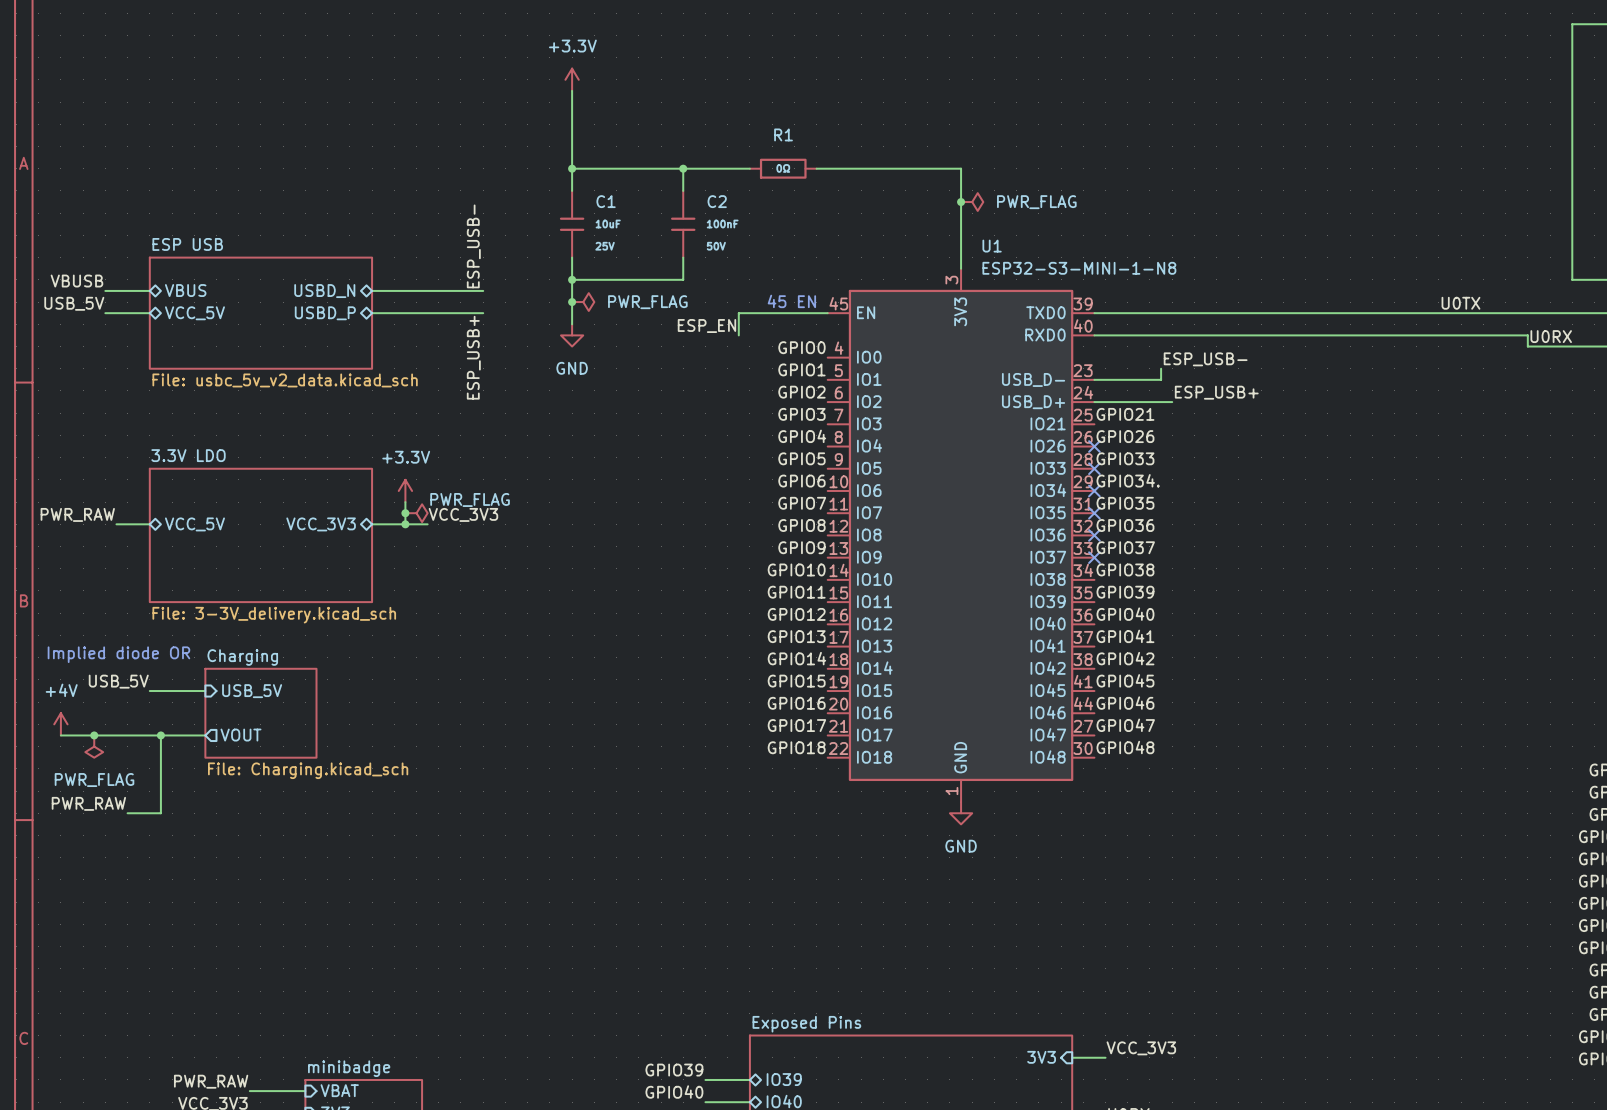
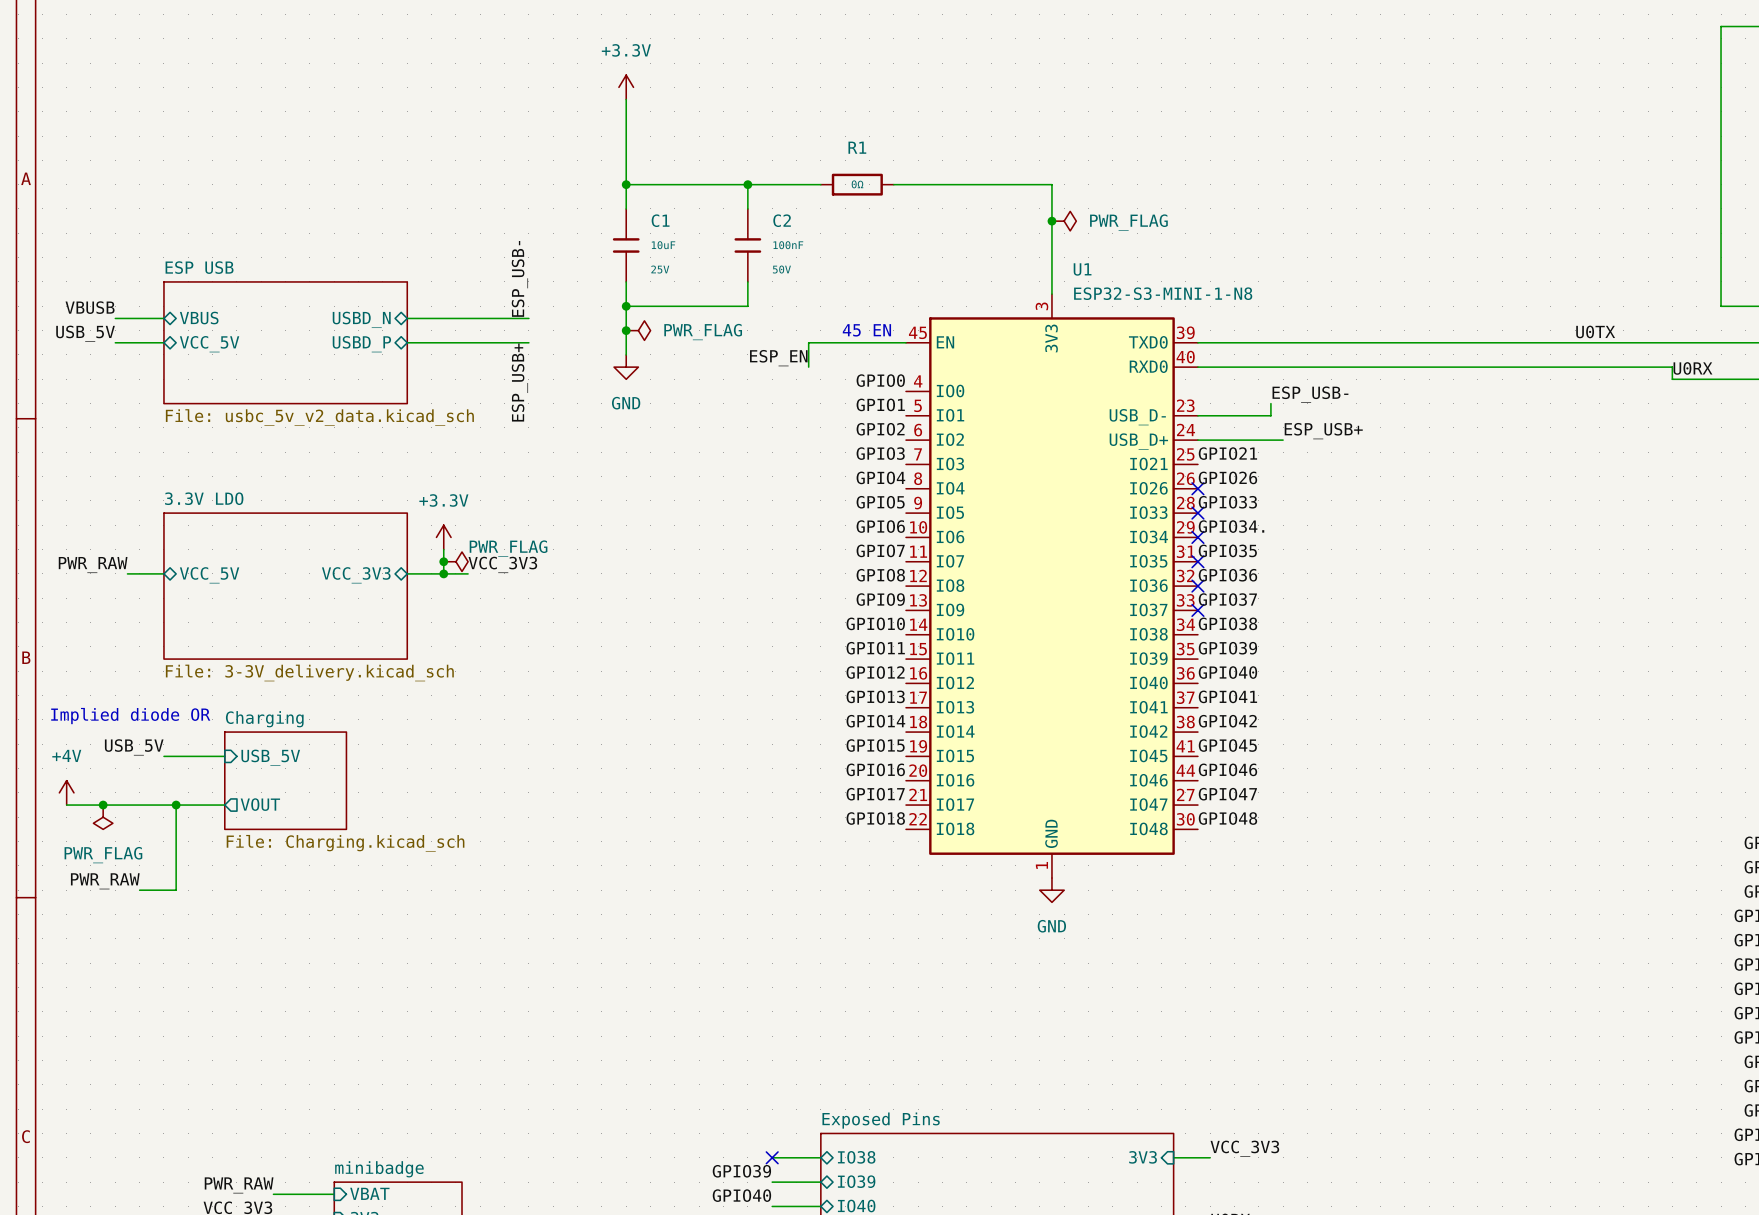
wire: none -> (772, 1157) (820, 1157)
no-connect mark: none -> (772, 1157)
sheet pin: none -> IO38 (856, 1157)

